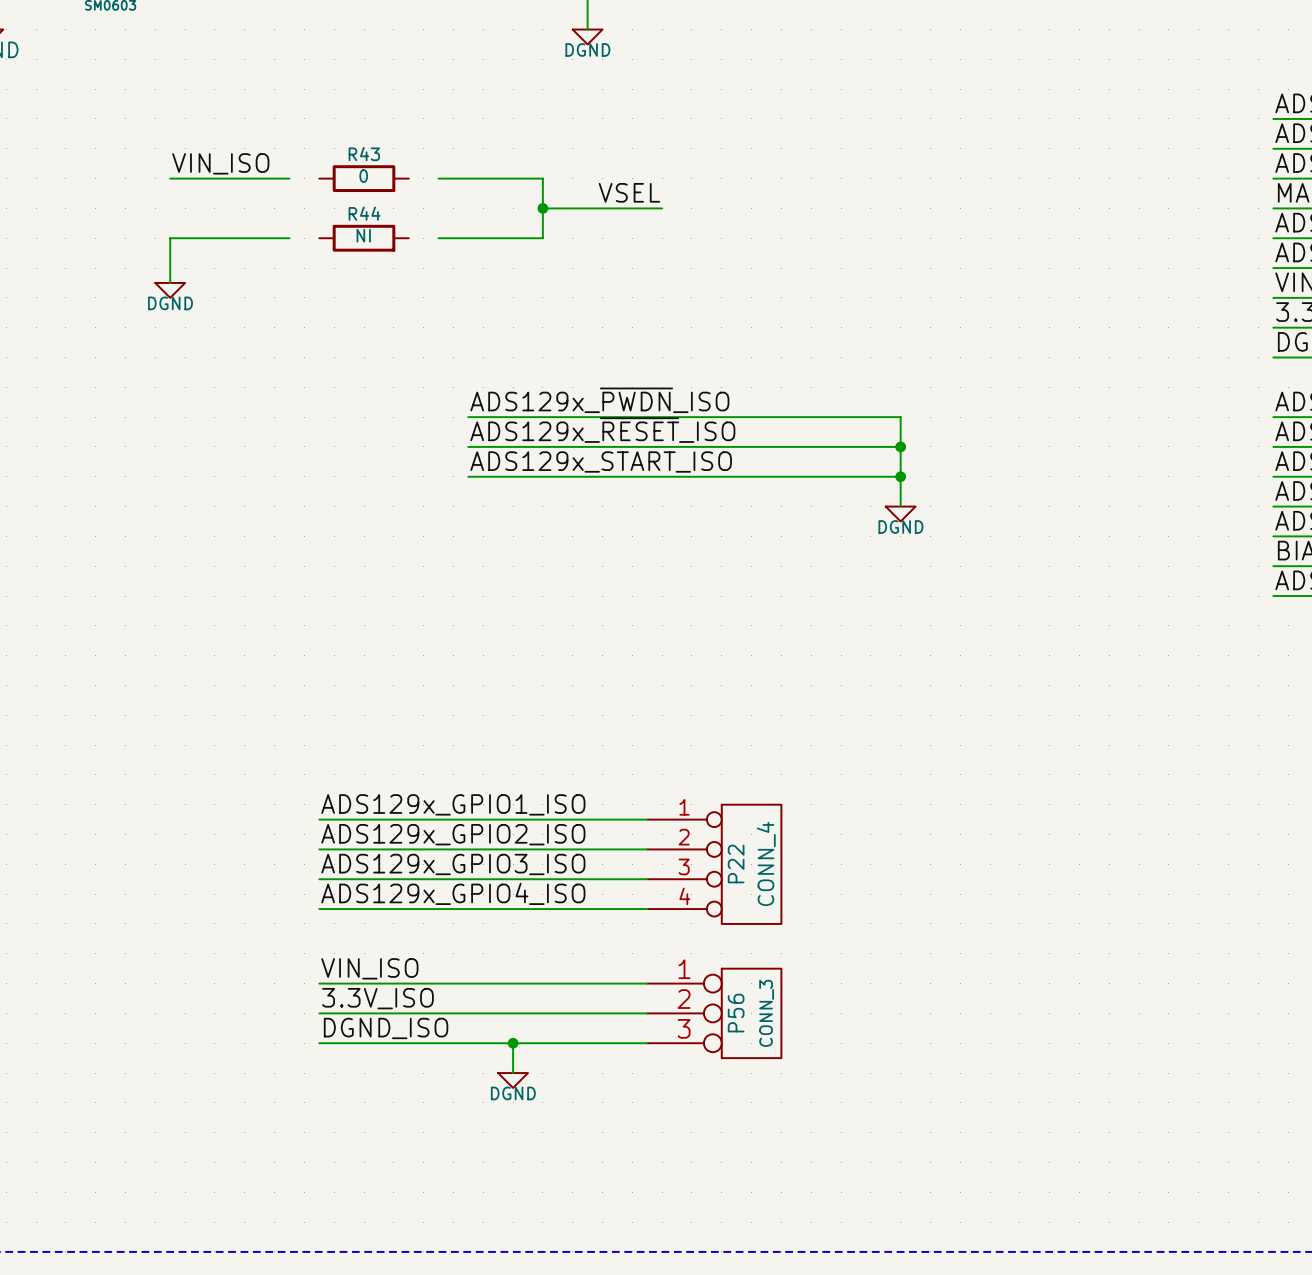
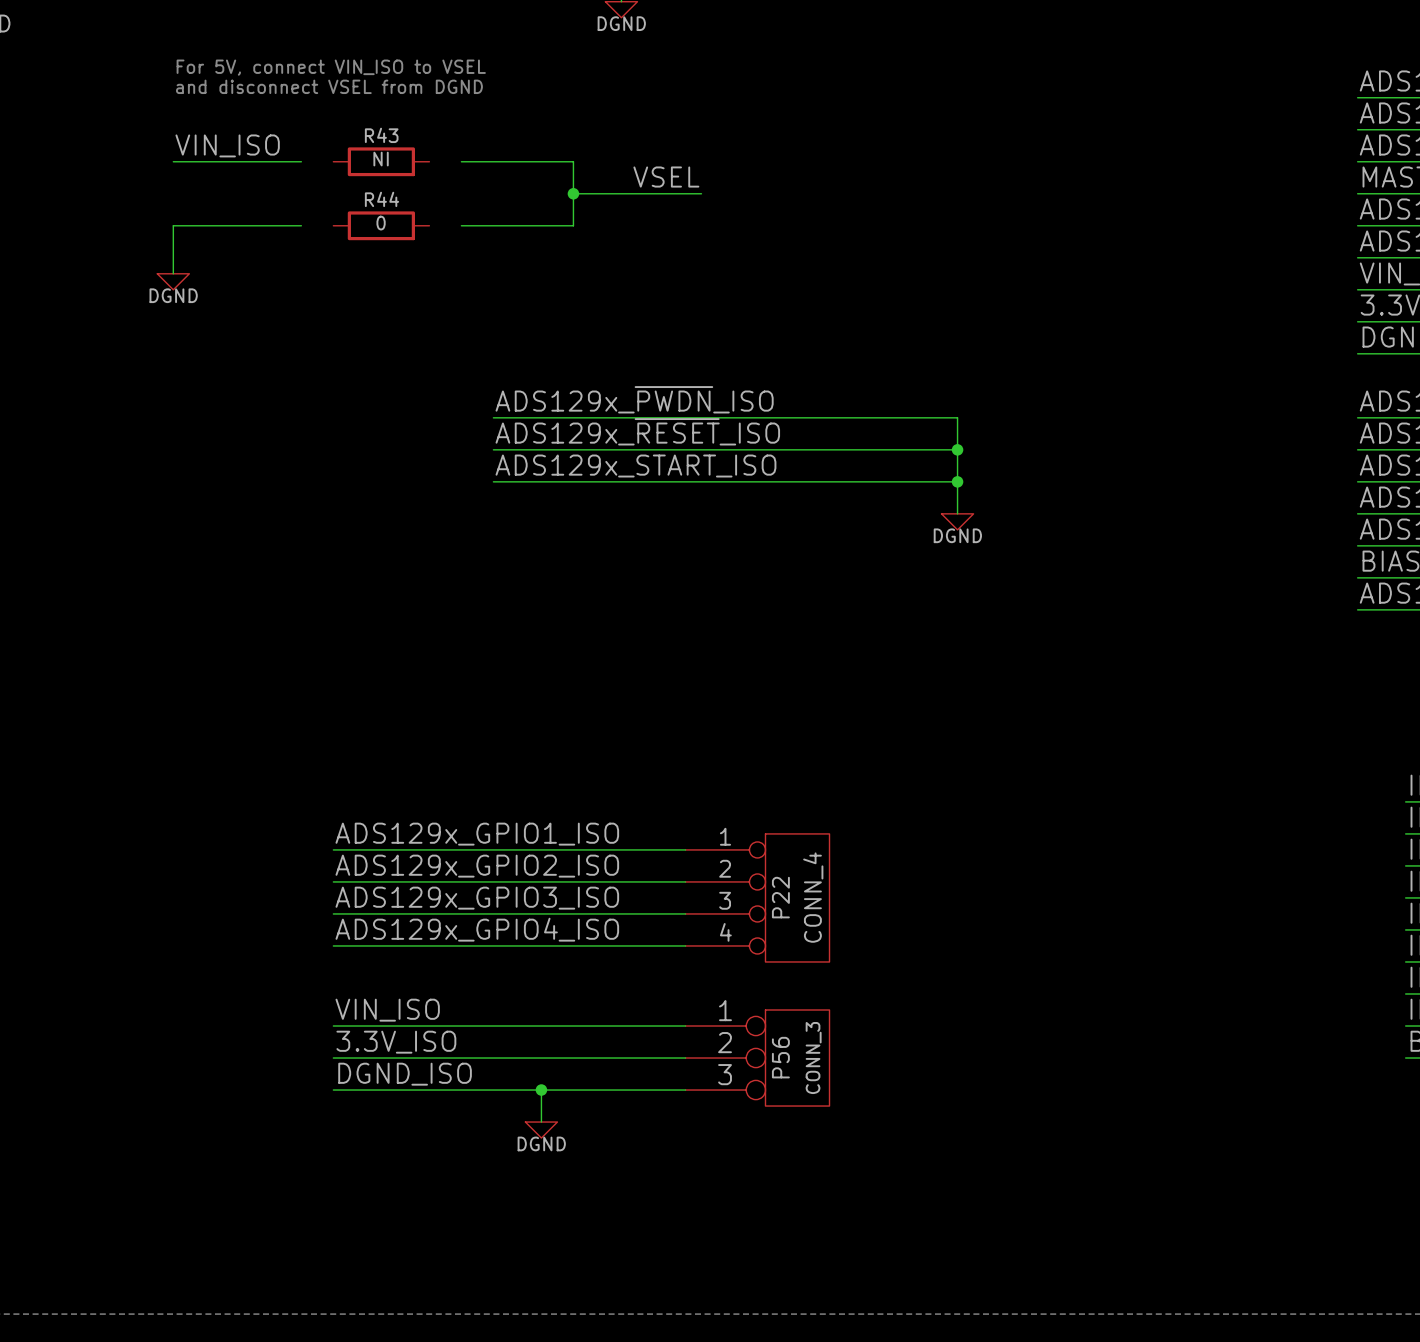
text: none -> For 5V, connect VIN_ISO to VSEL (331, 67)
text: none -> and disconnect VSEL from DGND (329, 86)
R43 value: 0 (363, 176) -> NI (381, 159)
R44 value: NI (363, 235) -> 0 (381, 223)

